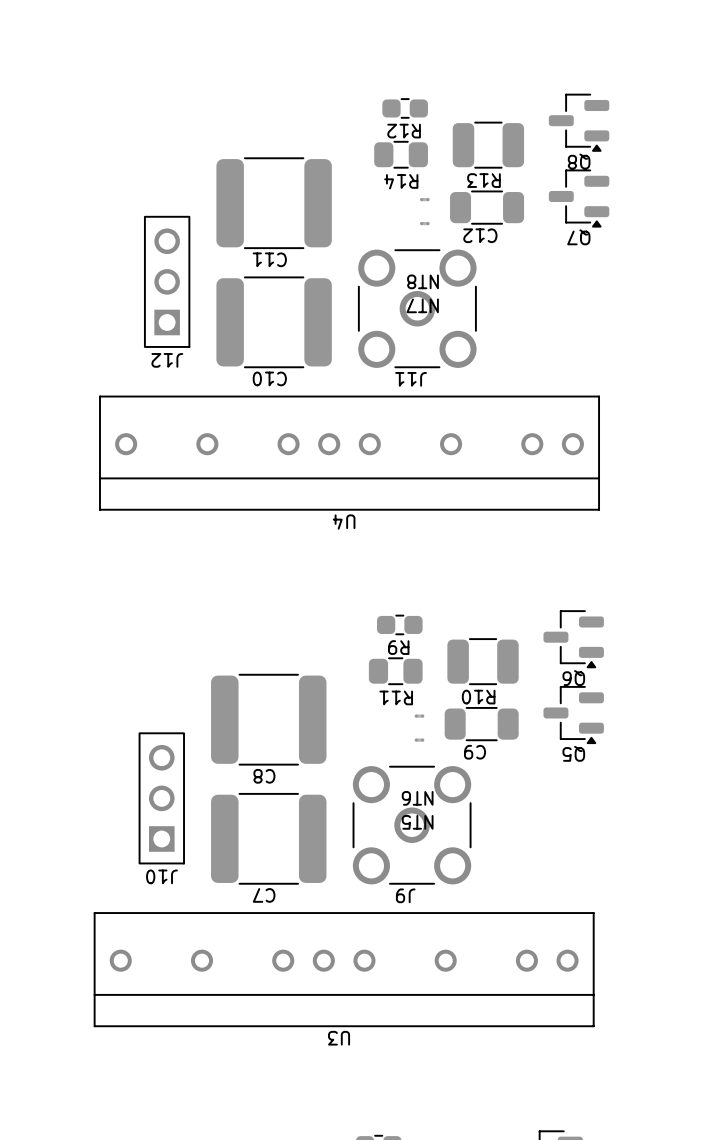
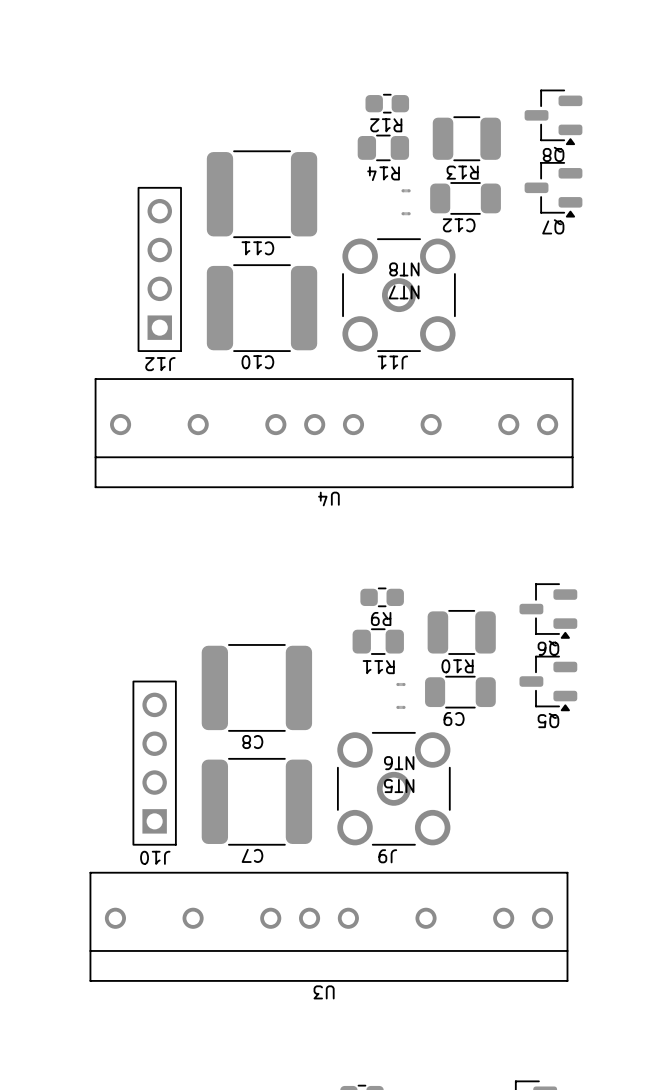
J12 footprint: [143, 215, 191, 348] -> [137, 186, 182, 352]
J10 footprint: [138, 732, 185, 865] -> [132, 680, 177, 846]

